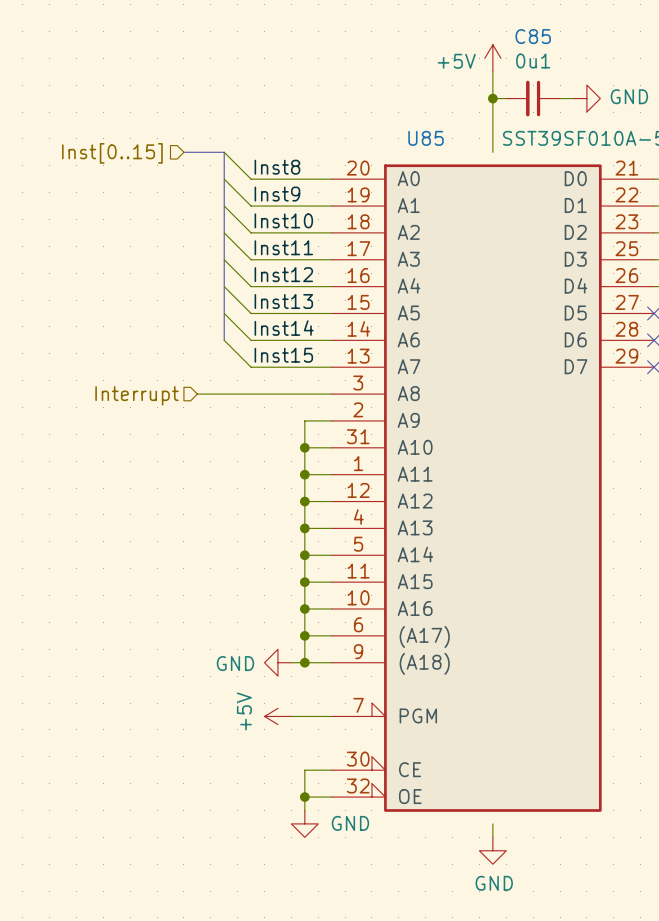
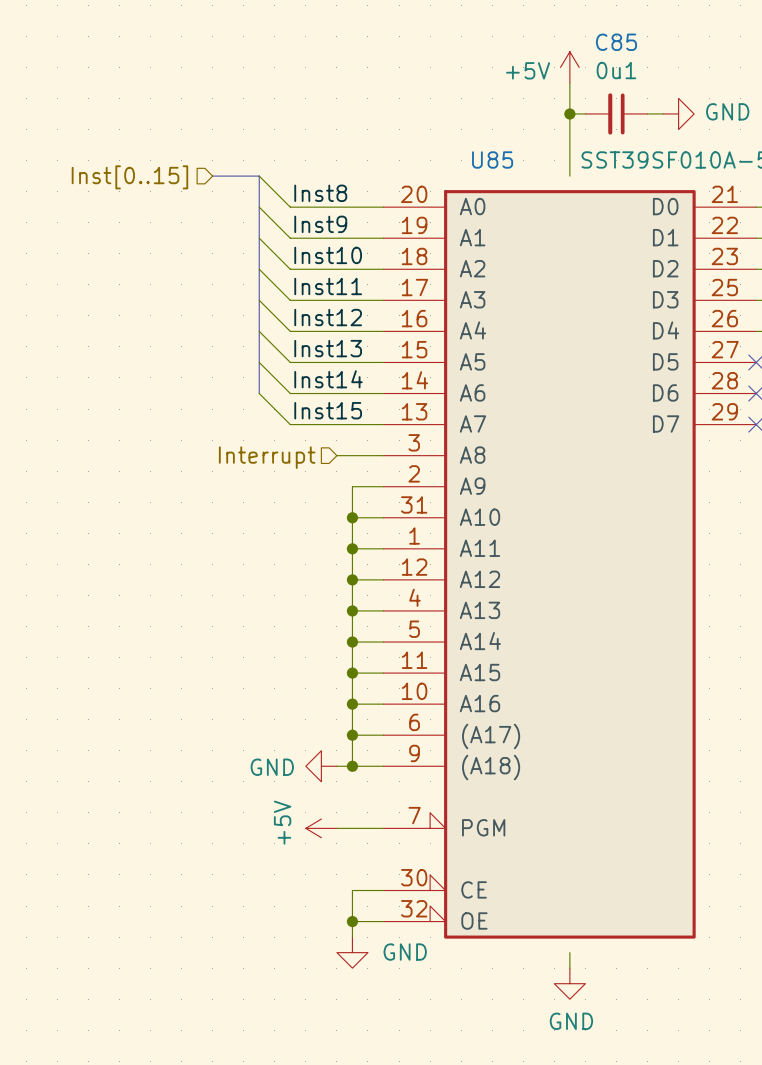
wire: (197, 394) (291, 394) -> none
hierarchical label position: Interrupt (137, 395) -> Interrupt (267, 457)

